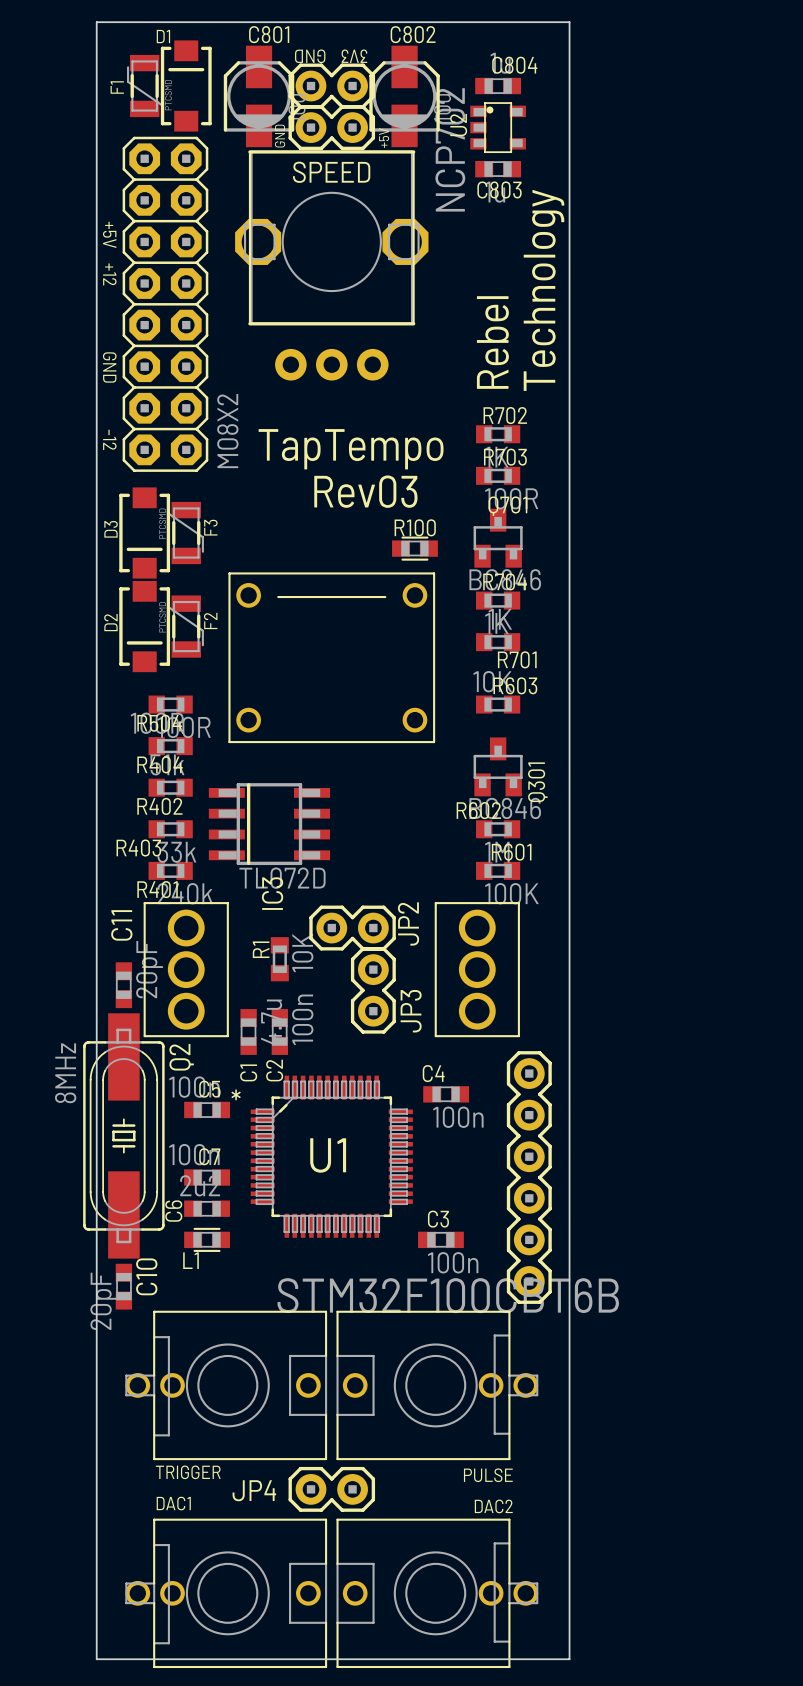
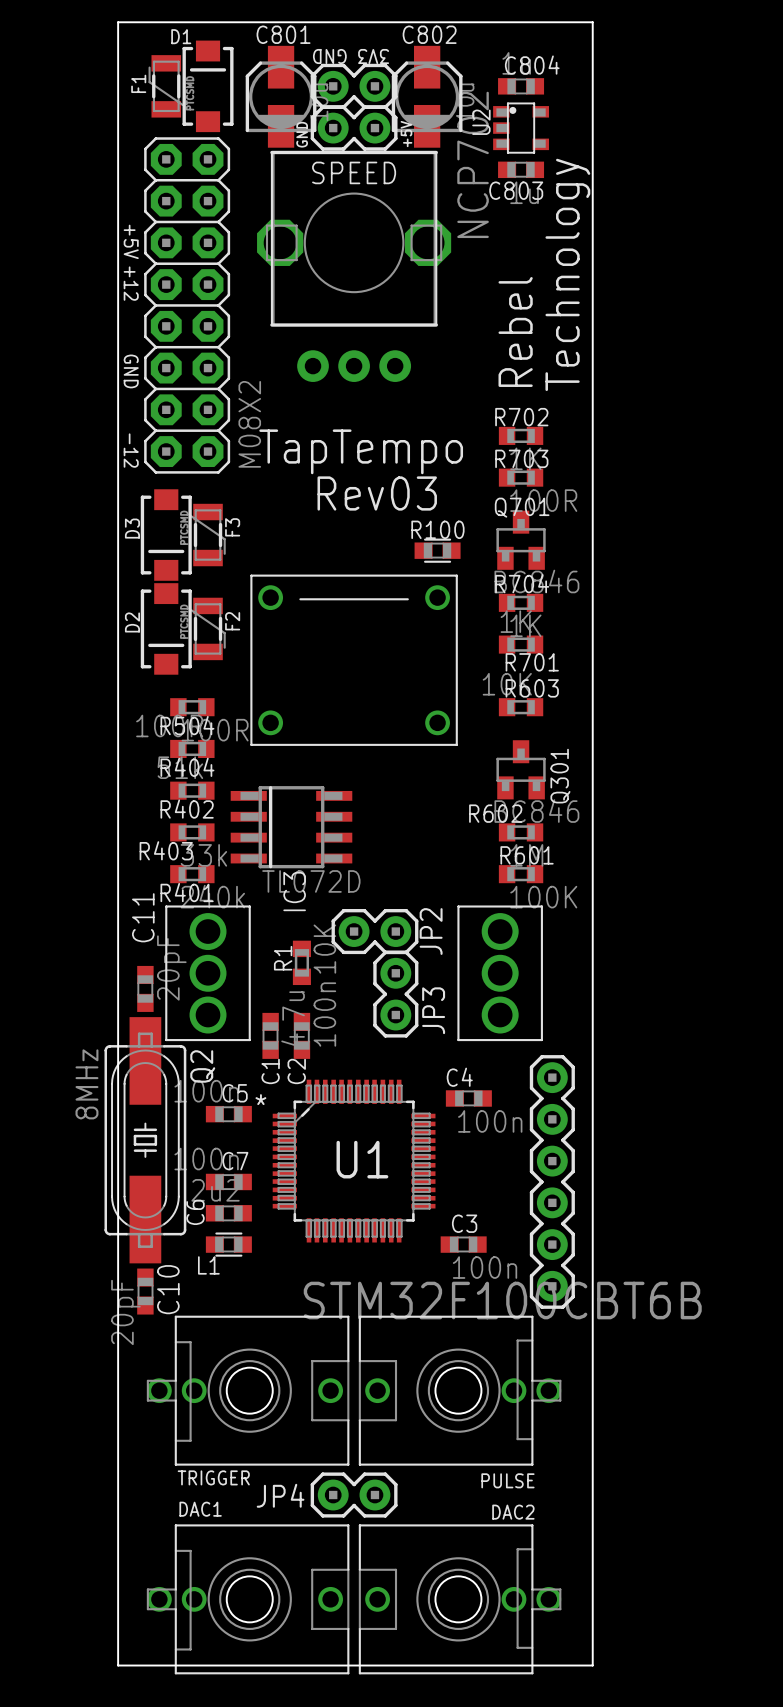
TRIGGER footprint: [125, 1310, 328, 1461] -> [146, 1315, 350, 1466]
PULSE footprint: [336, 1310, 539, 1461] -> [358, 1315, 562, 1466]
DAC1 footprint: [125, 1518, 328, 1669] -> [146, 1524, 350, 1675]
DAC2 footprint: [336, 1518, 539, 1669] -> [358, 1524, 562, 1675]

